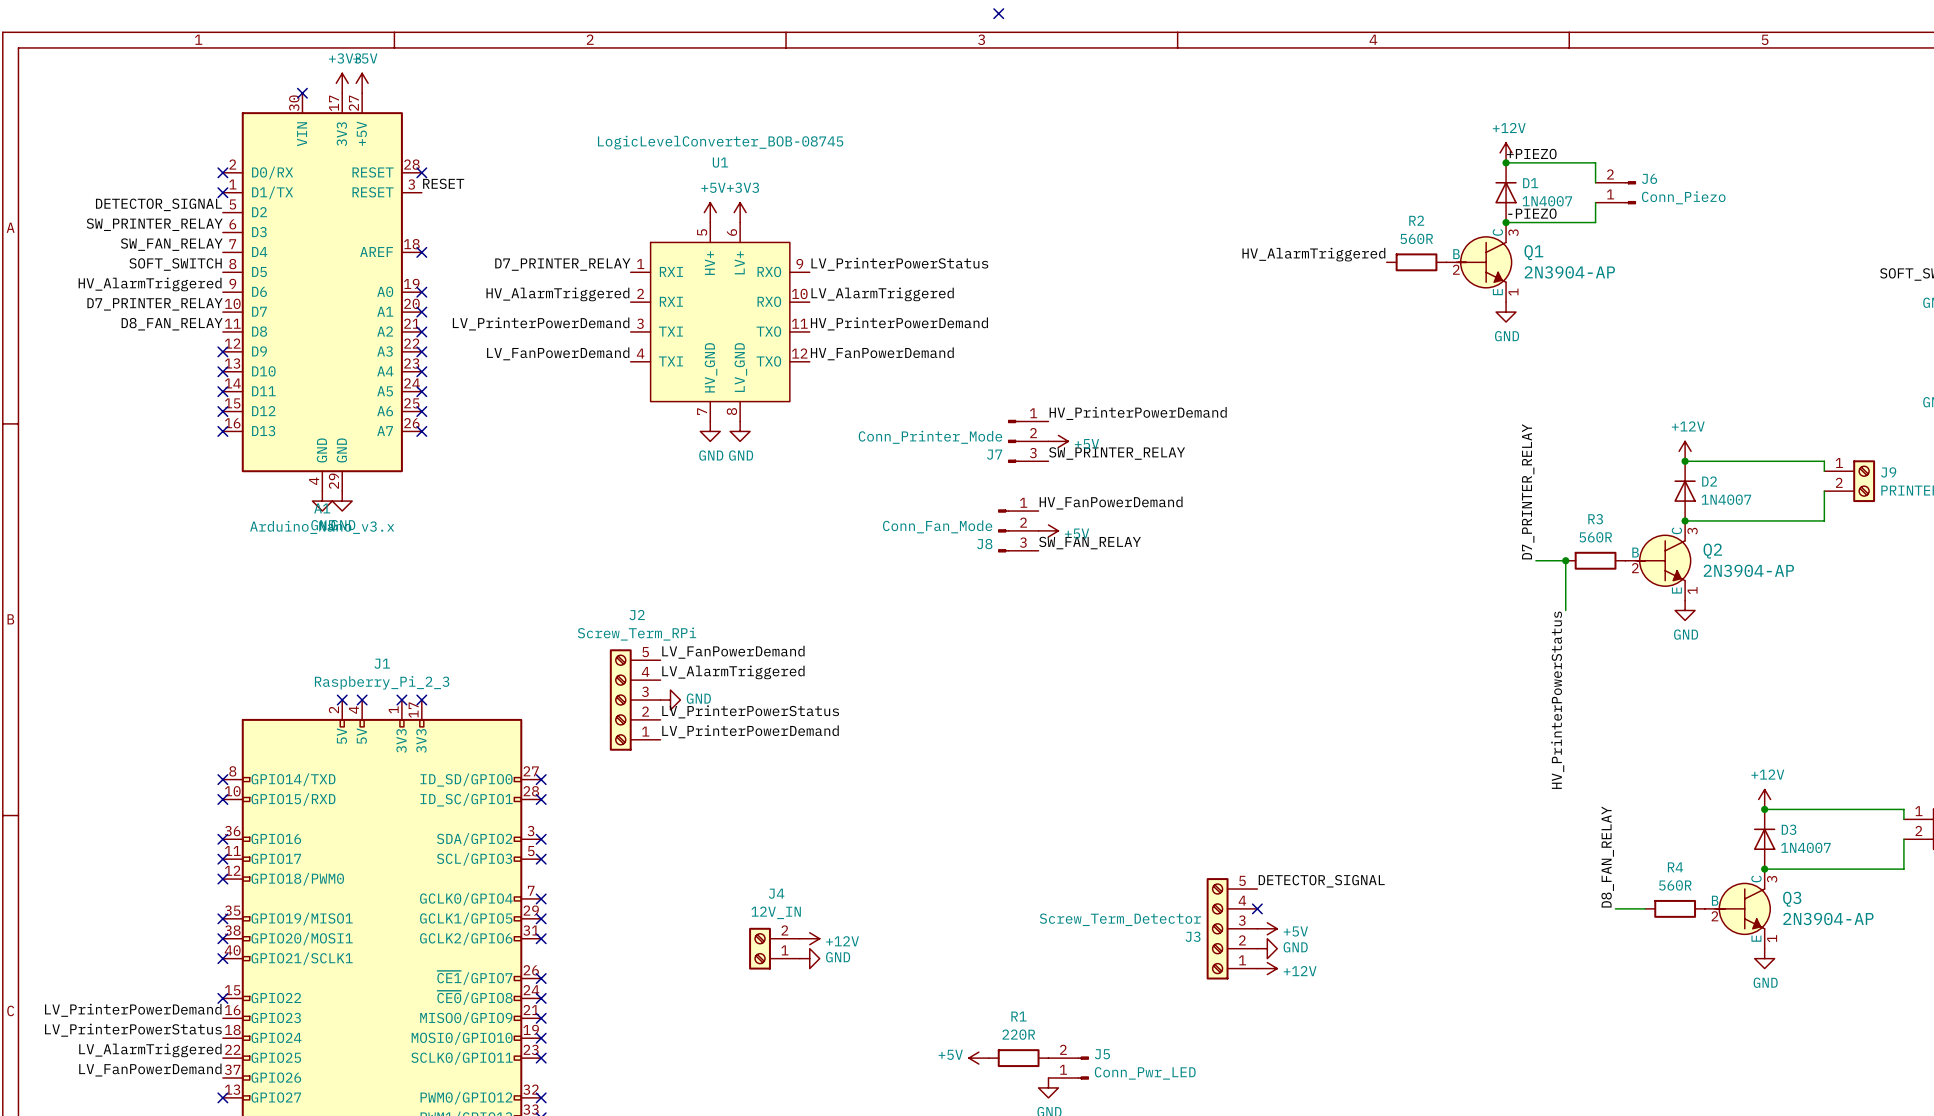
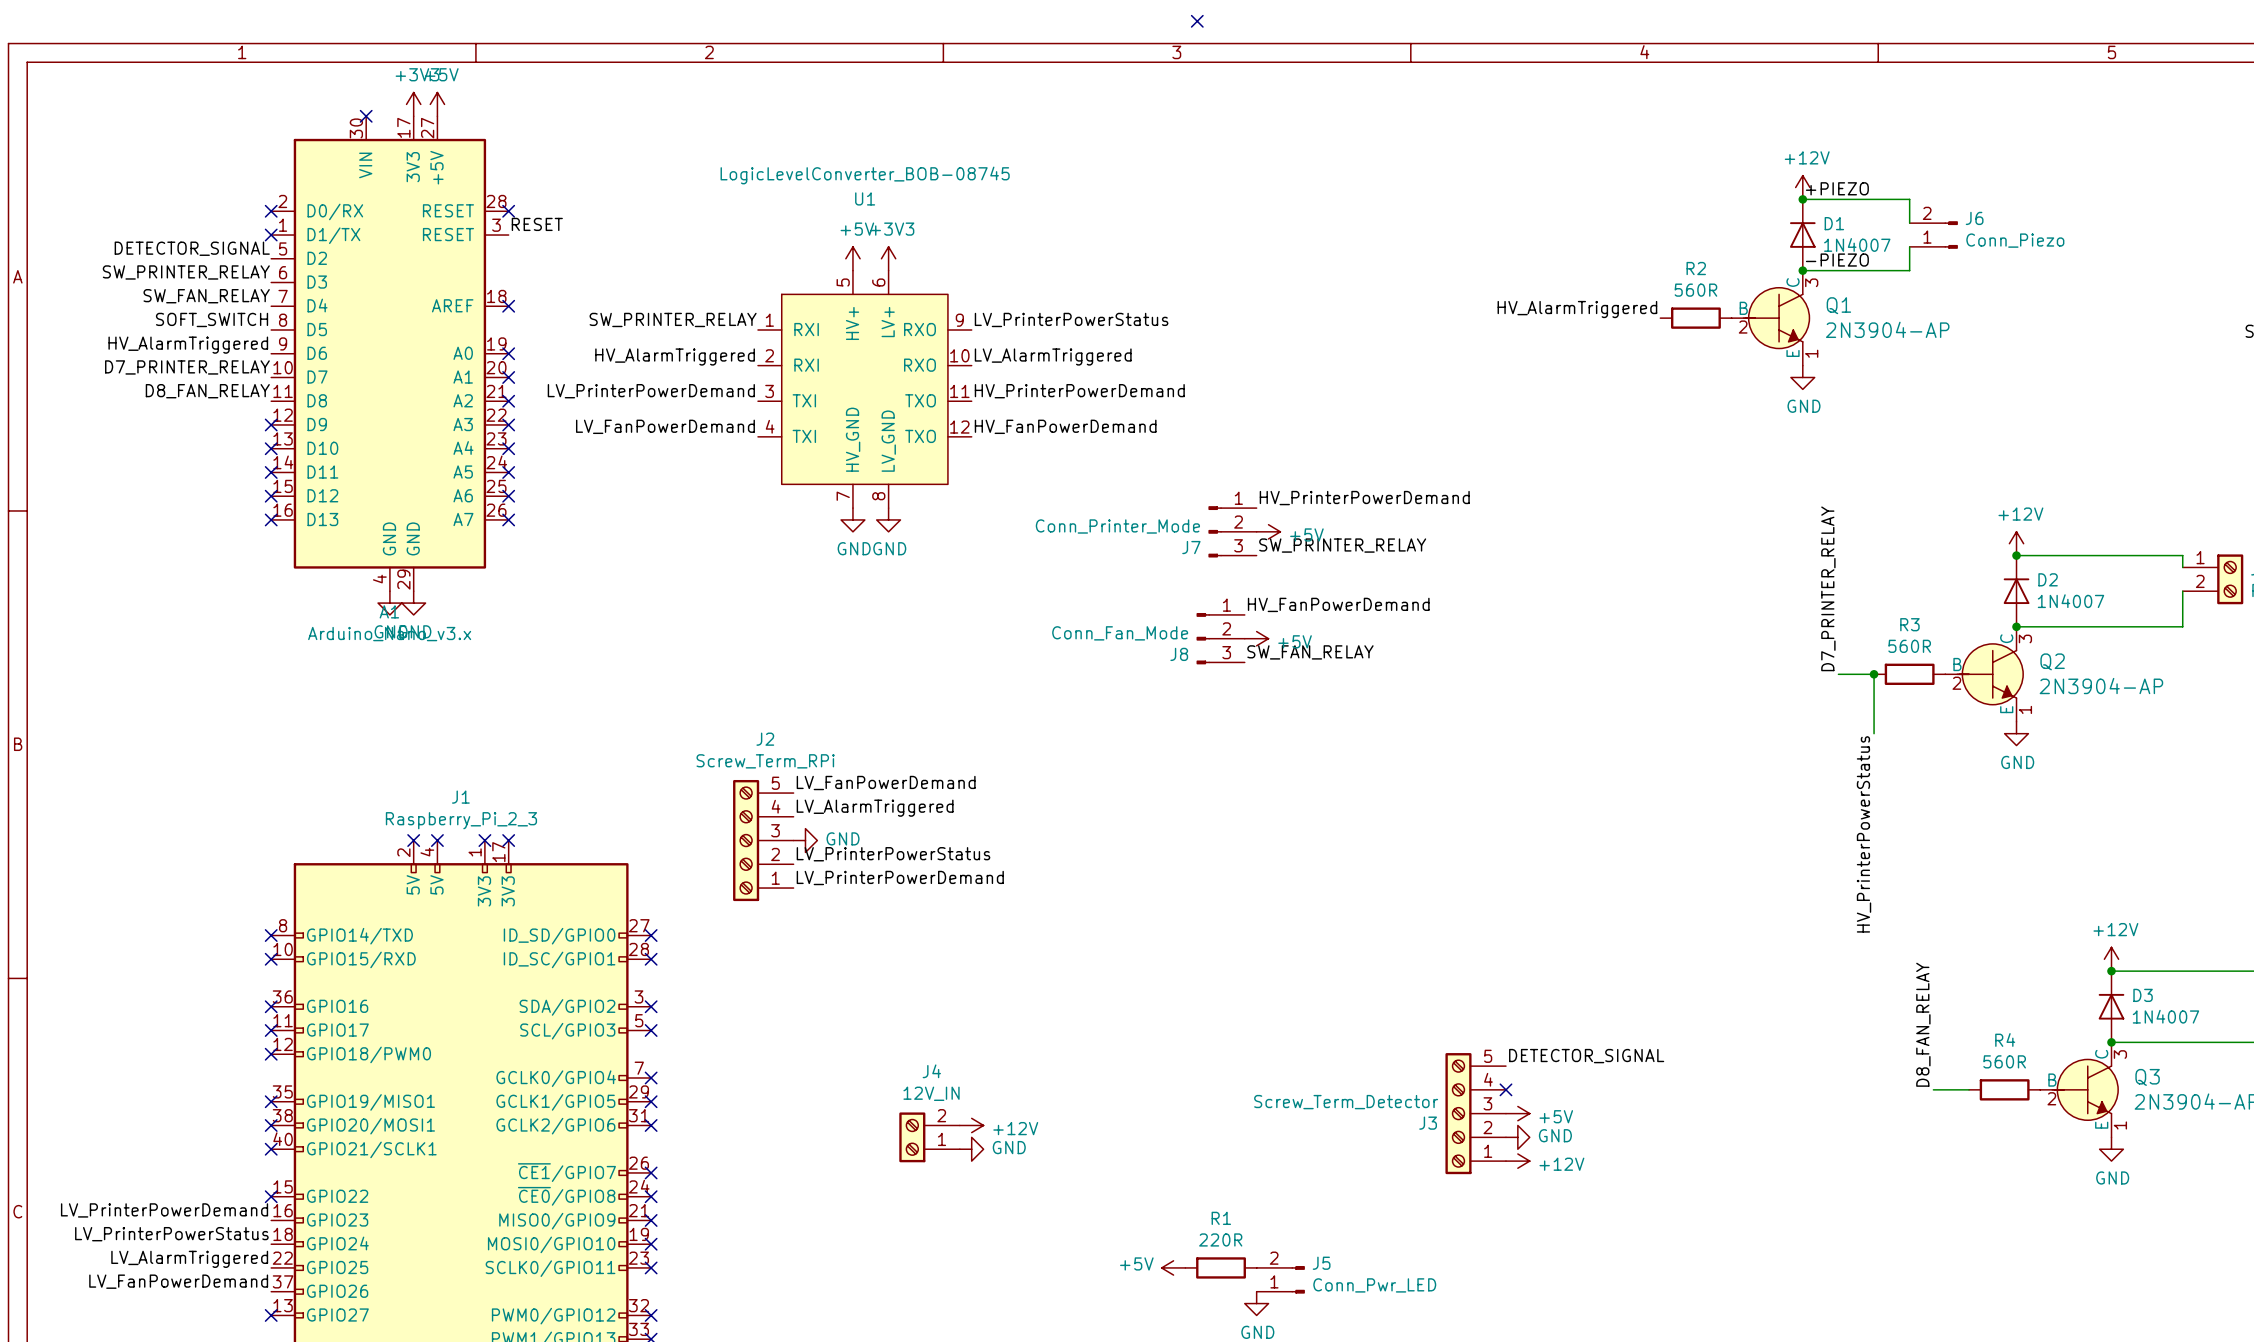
label: D7_PRINTER_RELAY (562, 264) -> SW_PRINTER_RELAY (673, 319)

